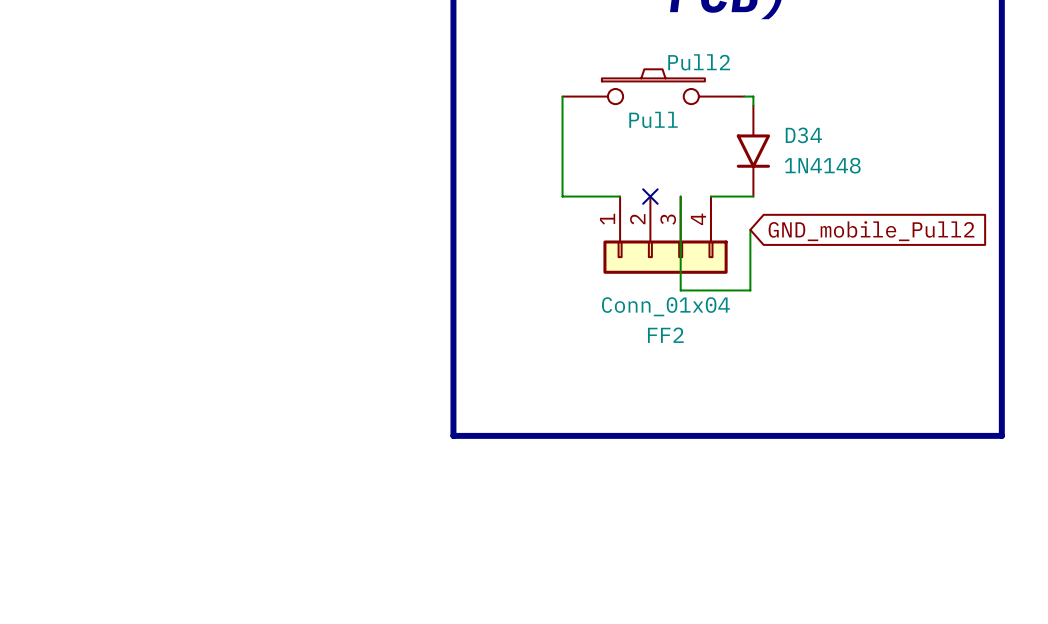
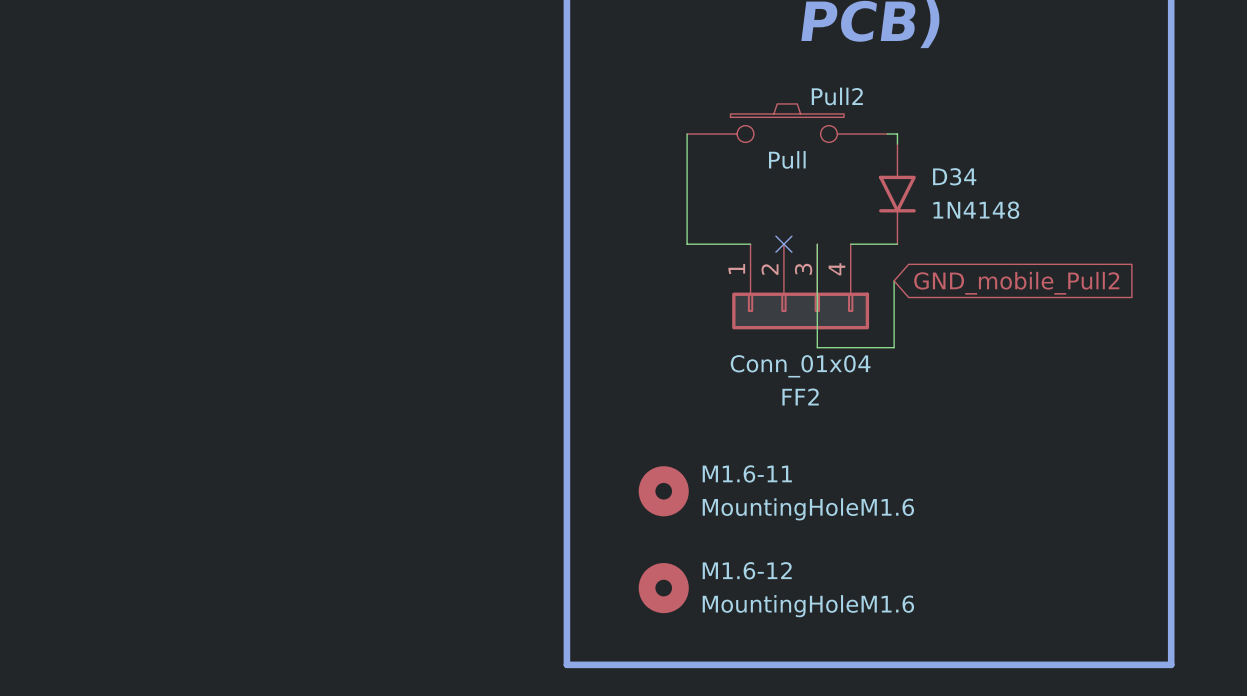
M1.6-11: none -> MountingHoleM1.6 (663, 491)
line: (453, 435) (1001, 435) -> (566, 507) (566, 664) (1171, 664) (1171, 507)
M1.6-12: none -> MountingHoleM1.6 (663, 588)

